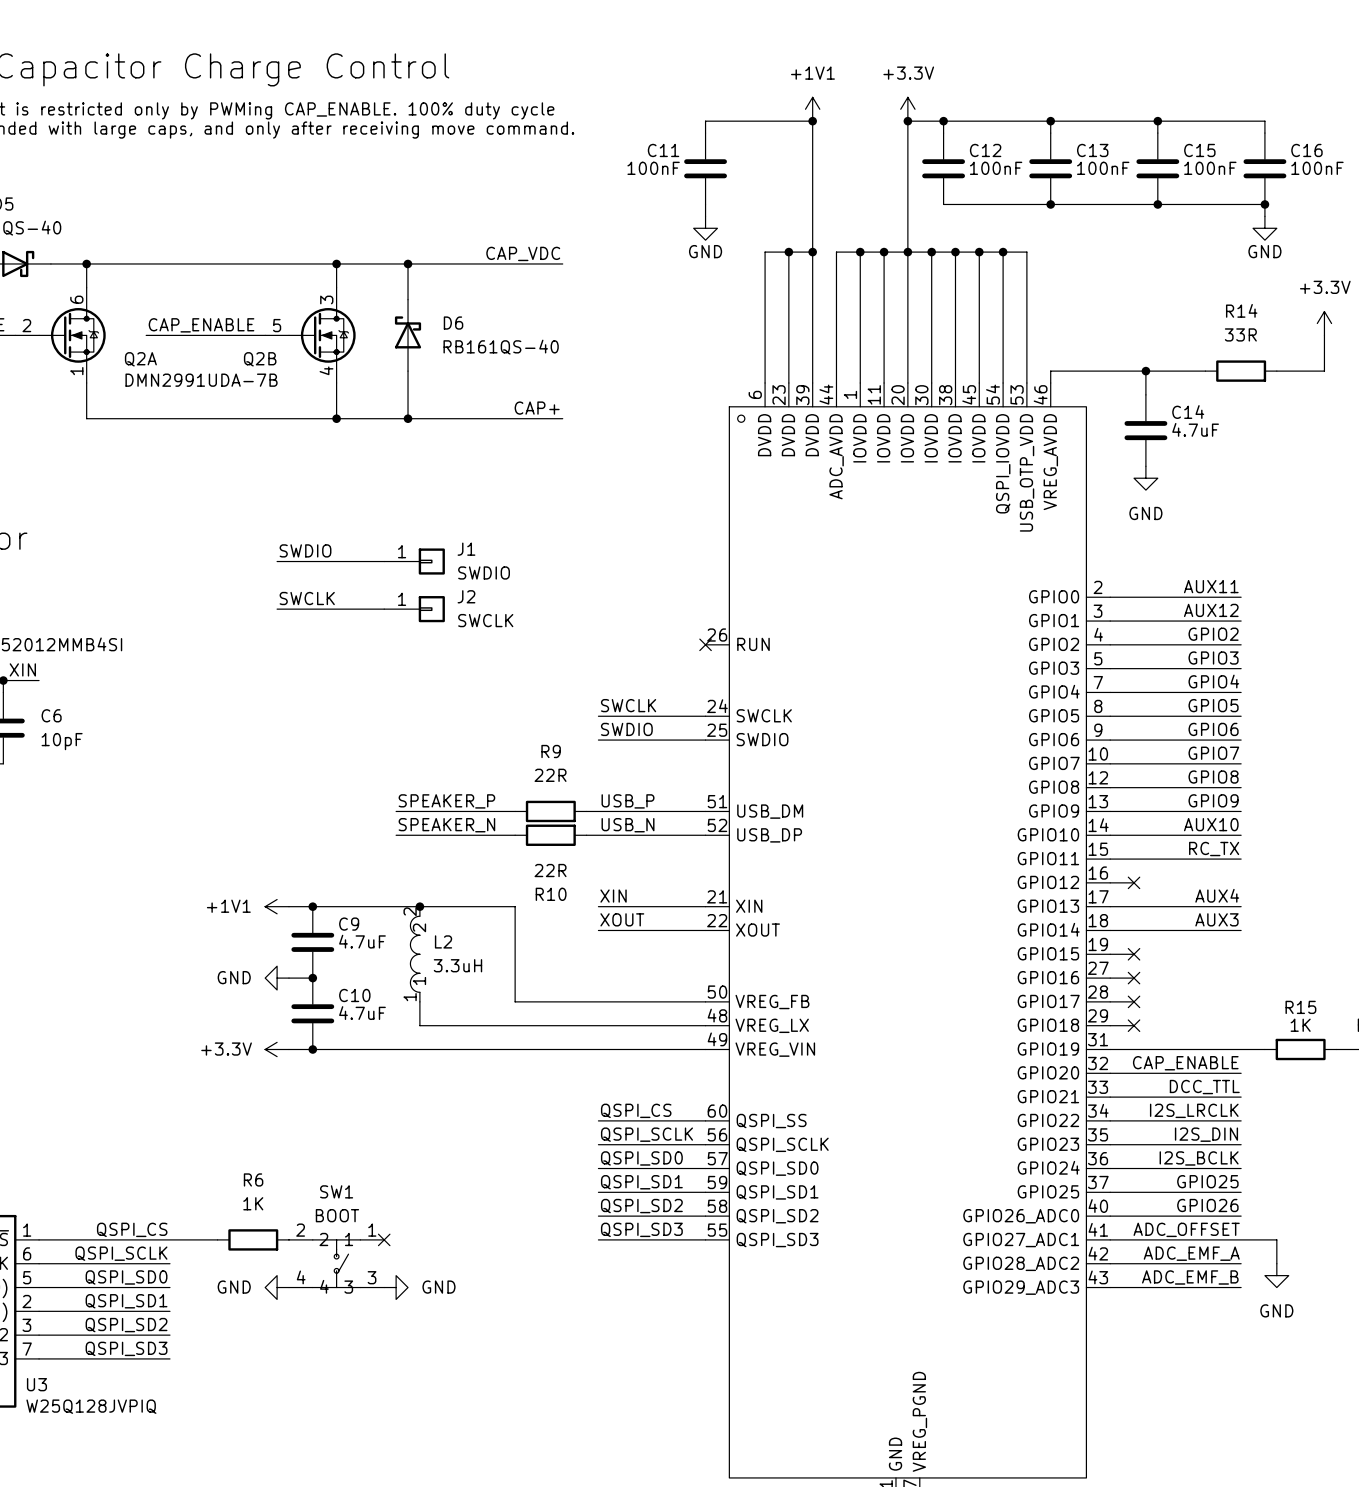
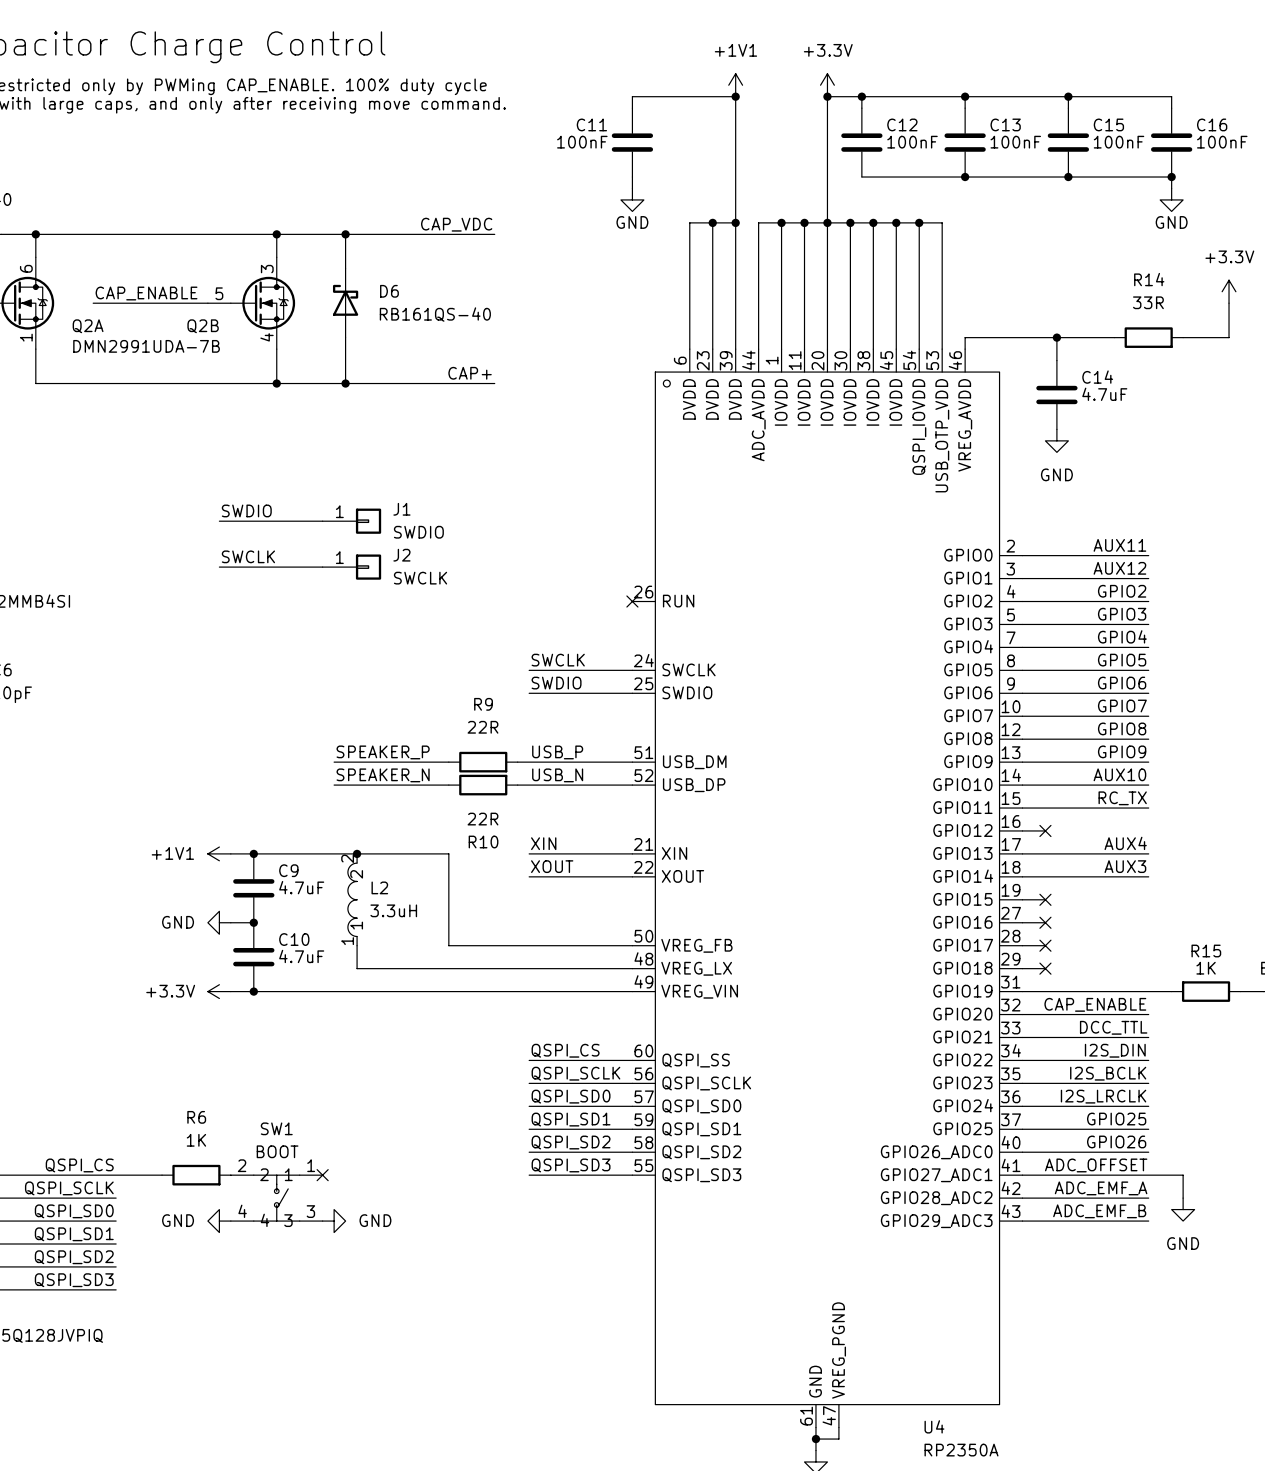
label: I2S_LRCLK (1194, 1110) -> I2S_DIN (1115, 1050)
label: I2S_DIN (1206, 1134) -> I2S_BCLK (1108, 1073)
label: I2S_BCLK (1199, 1158) -> I2S_LRCLK (1103, 1096)

